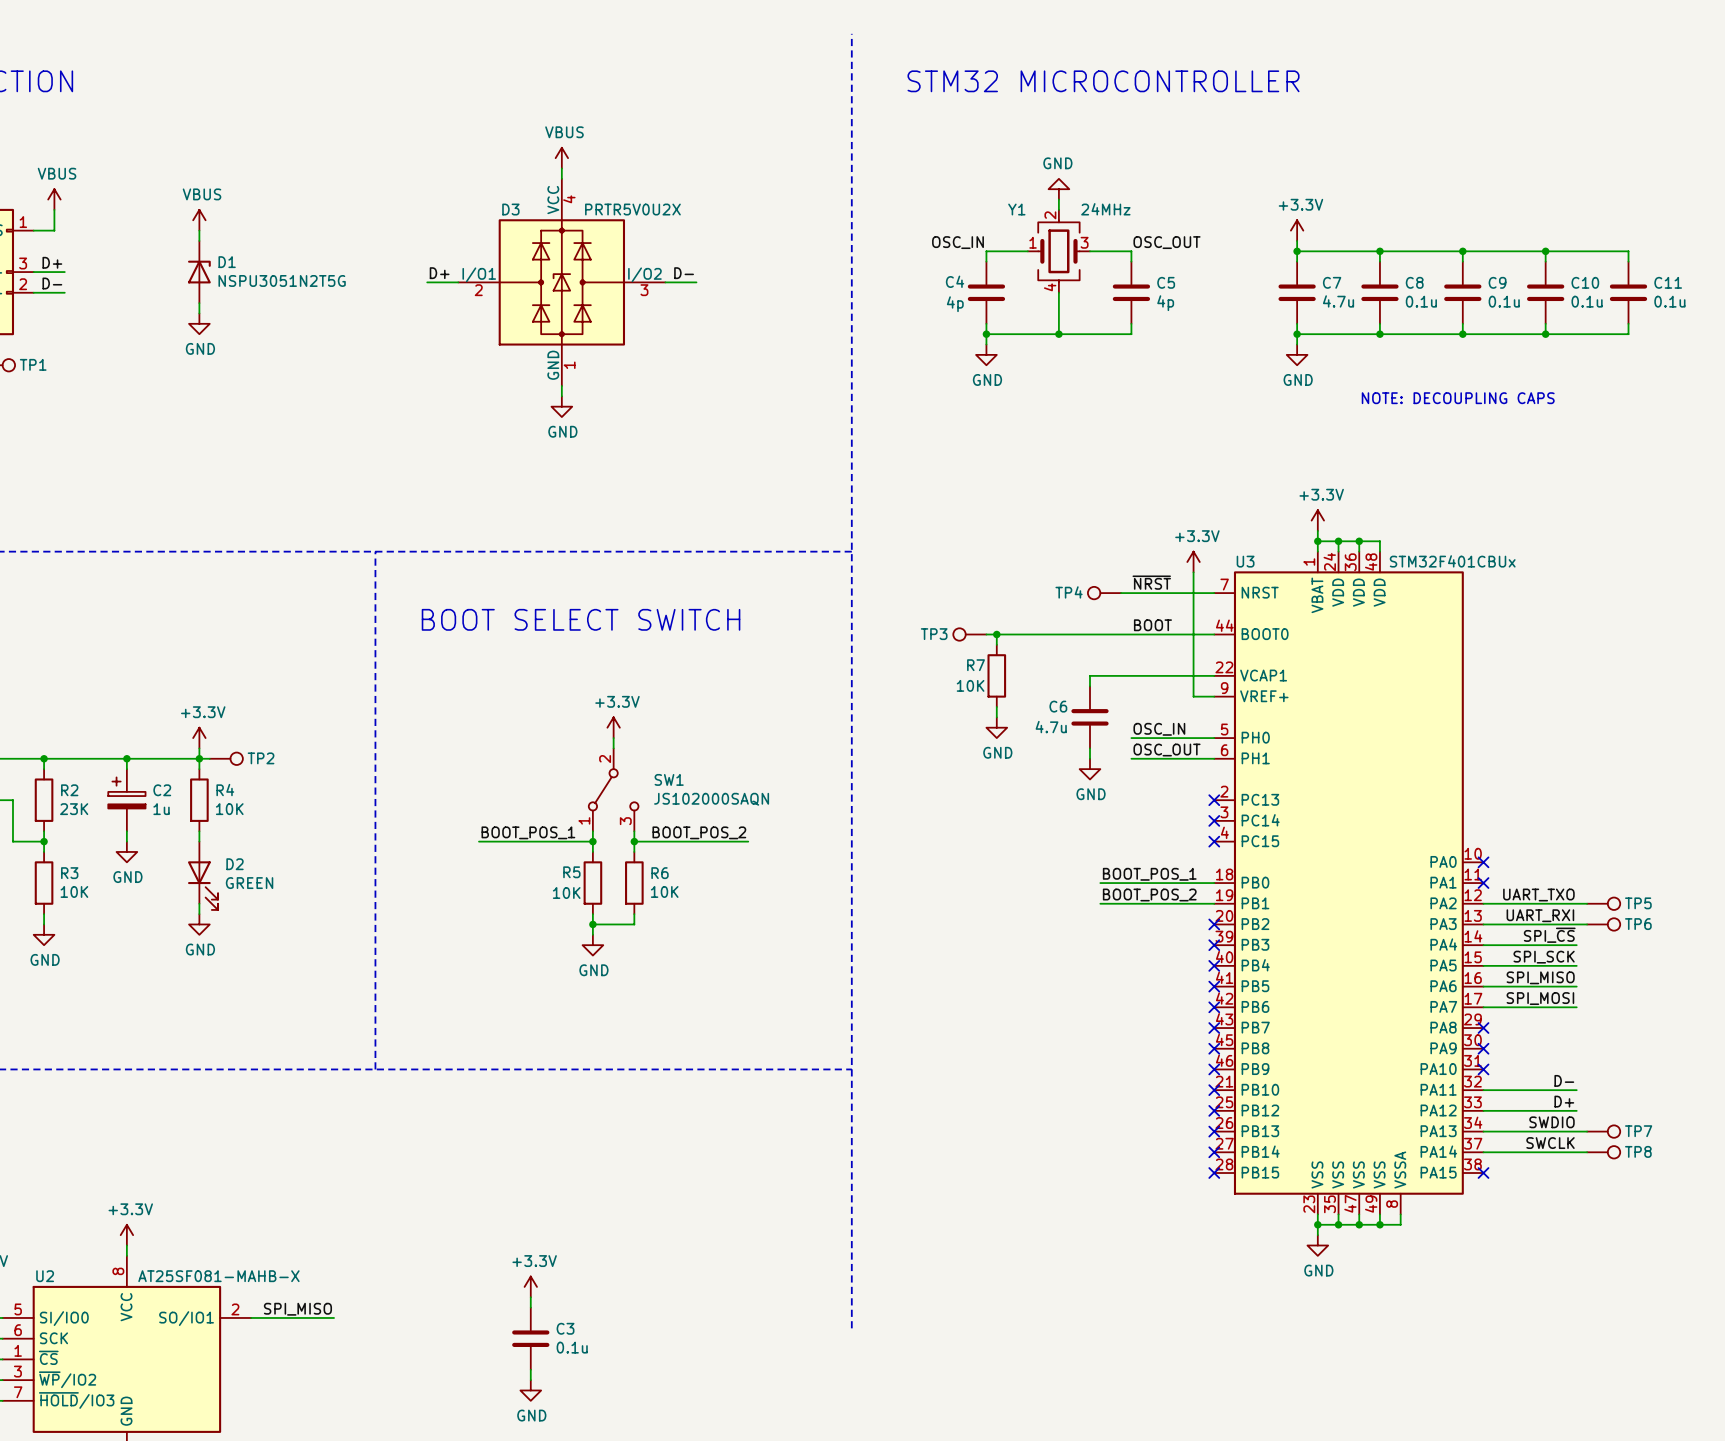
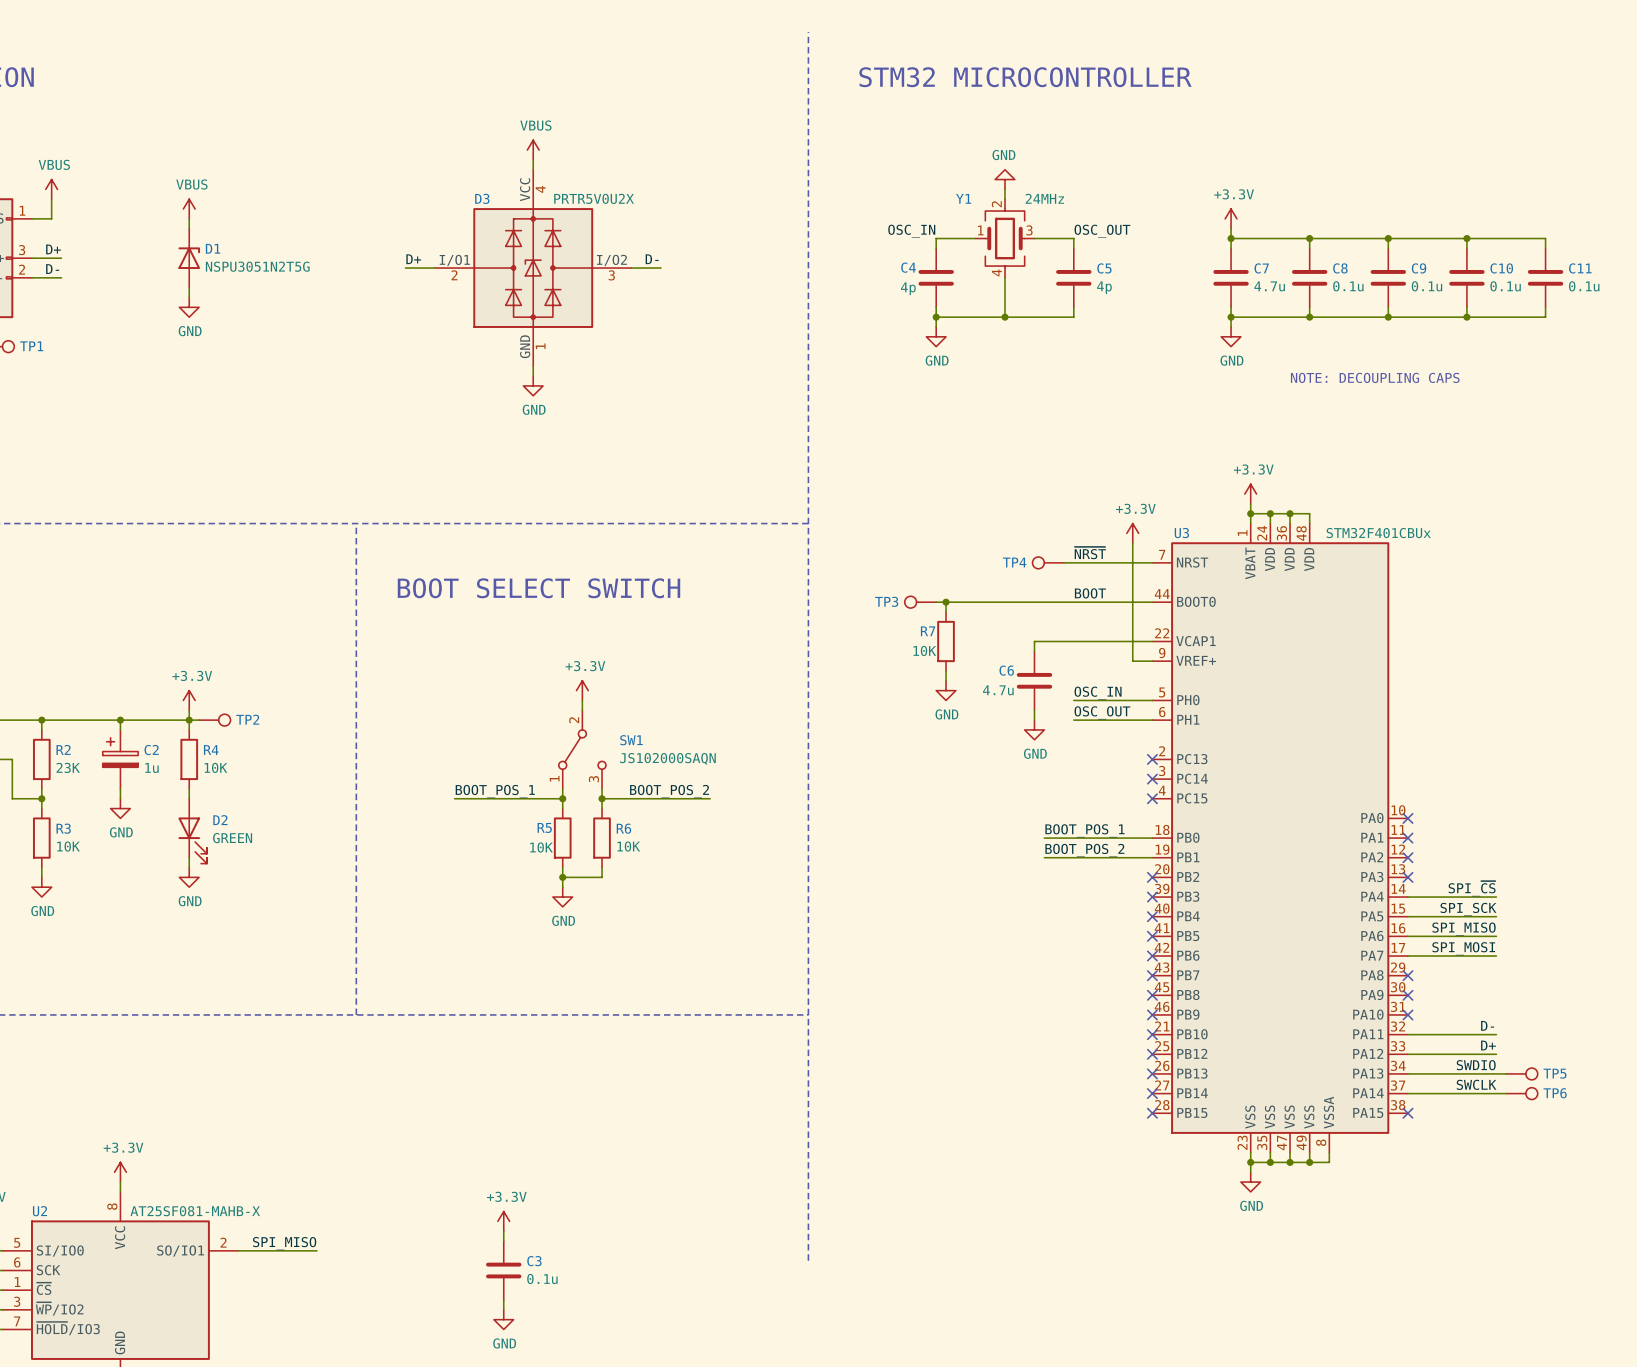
label: UART_TXO (1538, 895) -> none
wire: (1483, 903) (1587, 903) -> none
no-connect mark: none -> (1407, 857)
TP5: (1603, 903) -> none
label: UART_RXI (1540, 915) -> none
wire: (1483, 924) (1587, 924) -> none
no-connect mark: none -> (1407, 877)
TP6: (1603, 924) -> none
TP7 name: TP7 (1638, 1131) -> TP5 (1555, 1073)
TP8 name: TP8 (1638, 1151) -> TP6 (1555, 1093)

